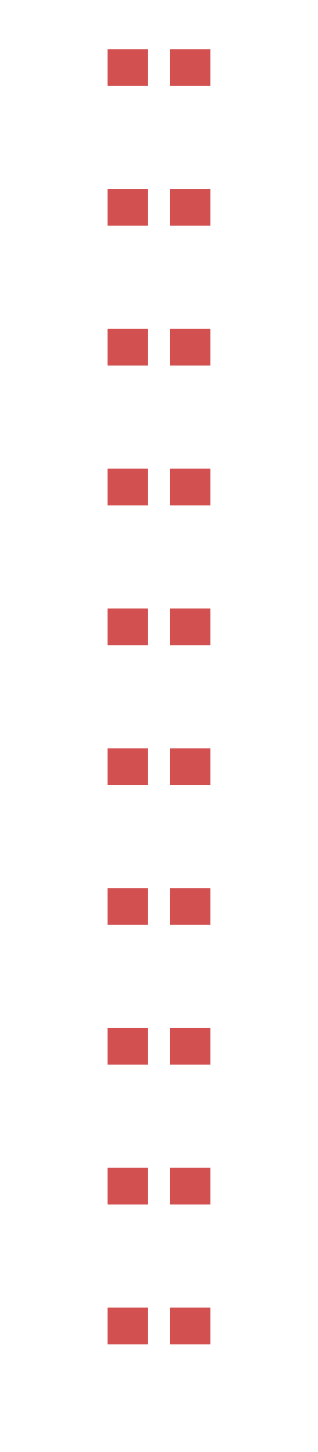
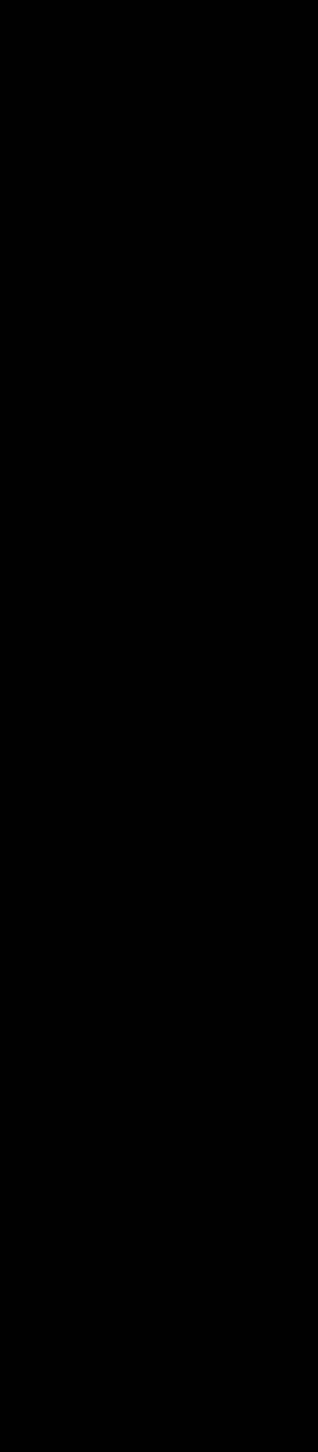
part: (158, 67) -> none
part: (158, 207) -> none
part: (158, 347) -> none
part: (158, 487) -> none
part: (158, 626) -> none
part: (158, 766) -> none
part: (158, 906) -> none
part: (158, 1046) -> none
part: (158, 1186) -> none
part: (158, 1325) -> none

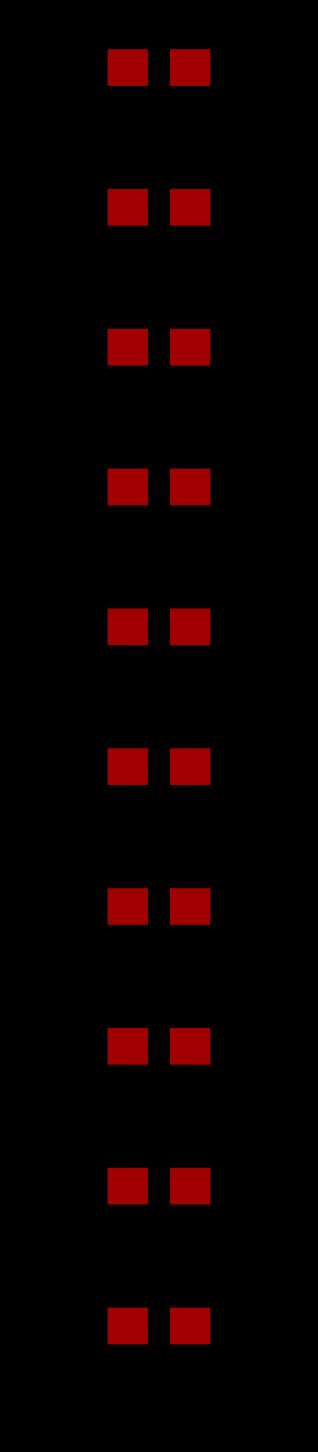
part: none -> (158, 67)
part: none -> (158, 207)
part: none -> (158, 347)
part: none -> (158, 487)
part: none -> (158, 626)
part: none -> (158, 766)
part: none -> (158, 906)
part: none -> (158, 1046)
part: none -> (158, 1186)
part: none -> (158, 1325)

